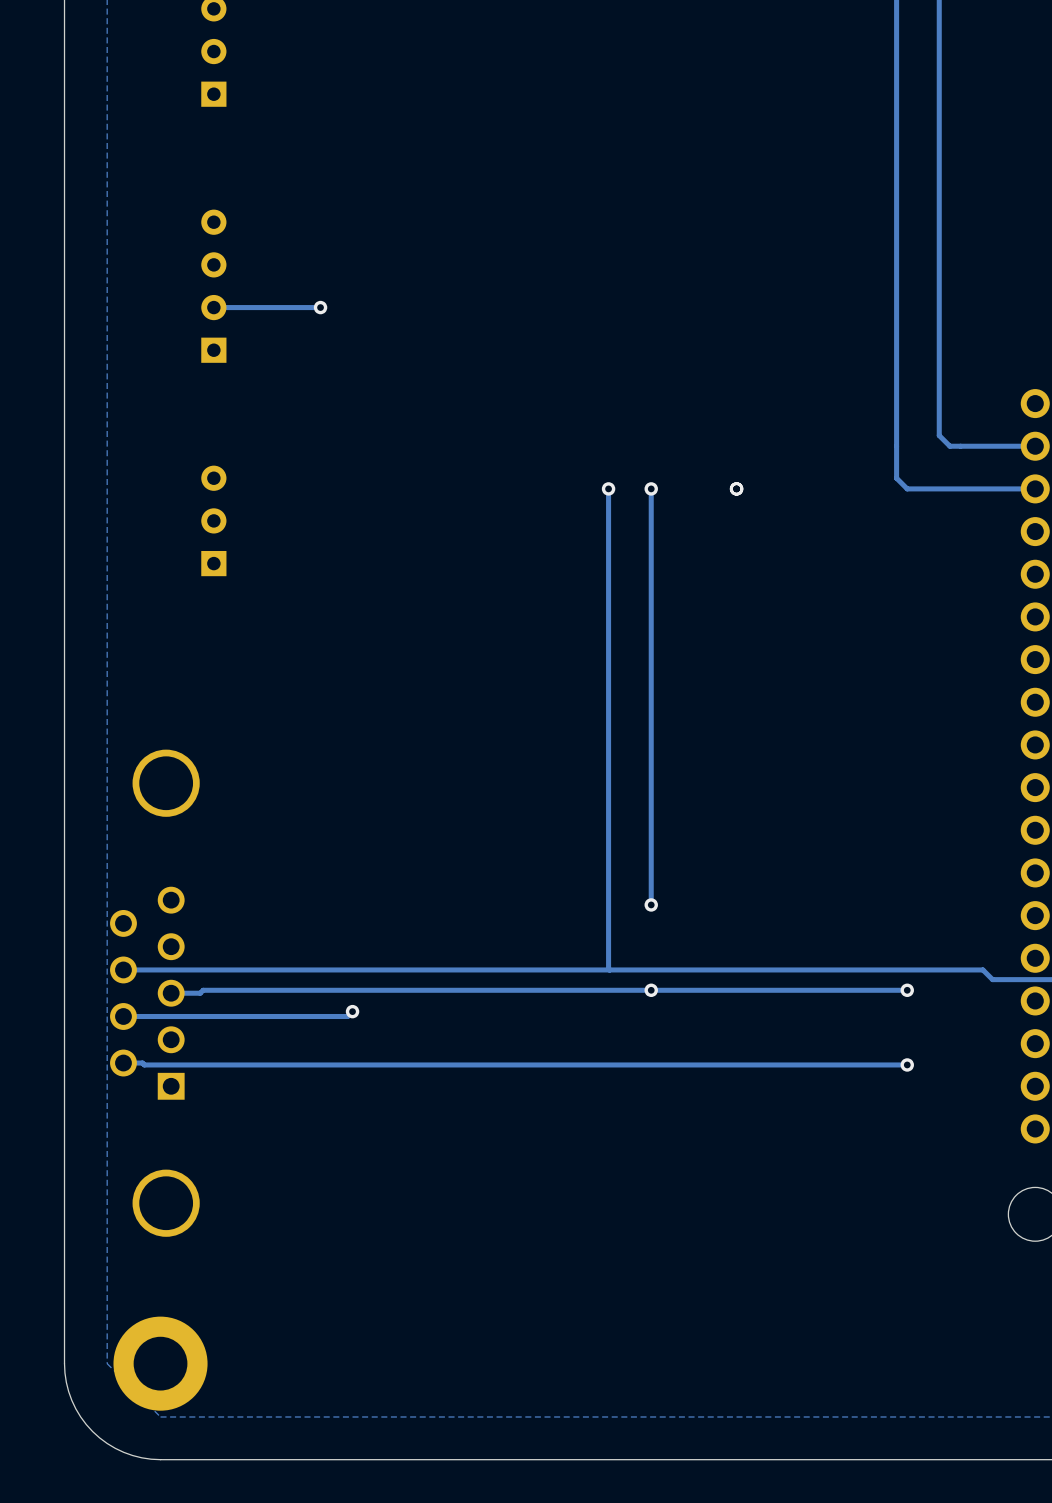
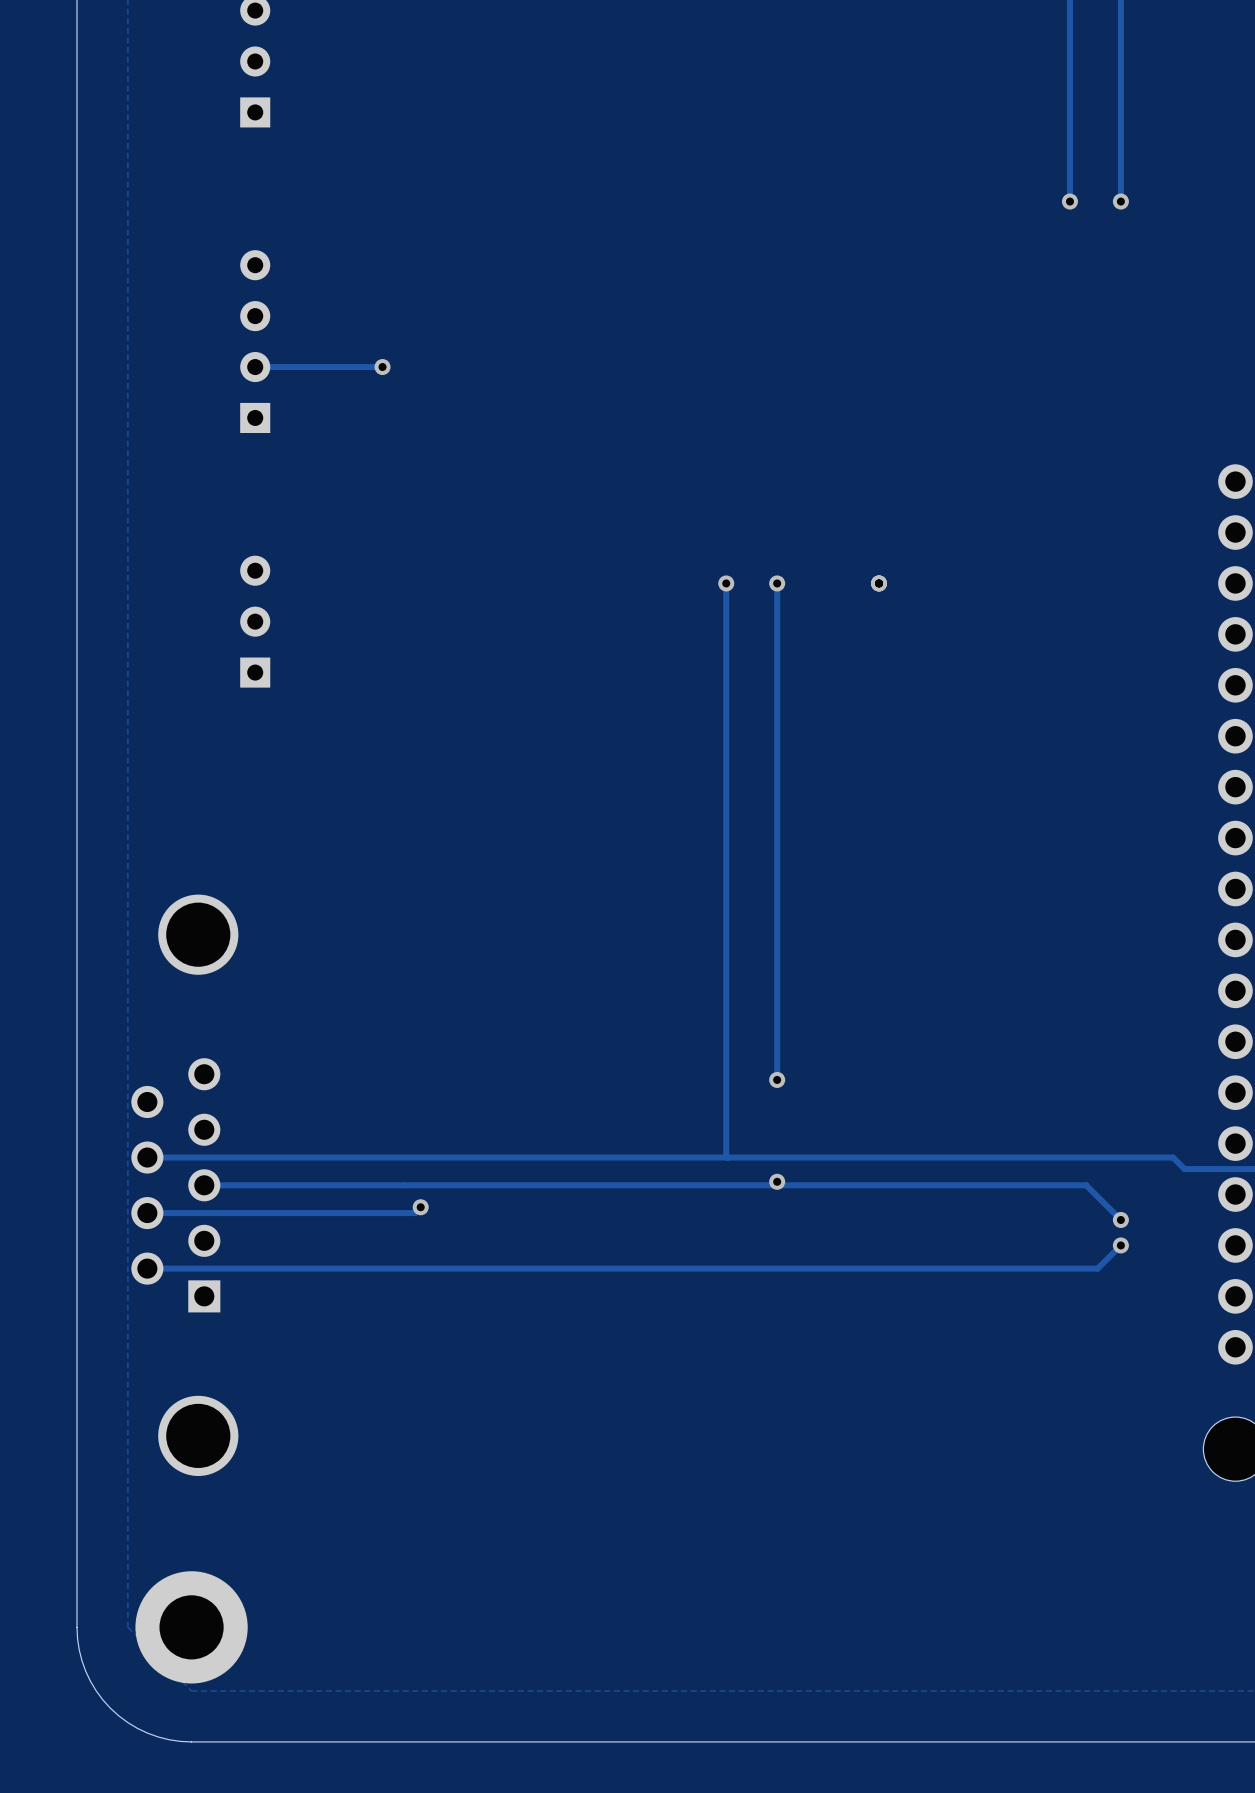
track: (896, 168) (896, 478) (907, 488) (1035, 488) -> none
via: none -> (1069, 201)
track: (939, 168) (939, 435) (949, 446) (1035, 446) -> none
via: none -> (1120, 201)
track: (907, 990) (203, 990) (200, 993) -> (1120, 1219) (1086, 1185) (238, 1185)
via: (907, 990) -> none
via: none -> (1120, 1219)
via: none -> (1120, 1245)
track: (142, 1063) (144, 1064) (907, 1064) -> (170, 1268) (1097, 1268) (1120, 1245)
via: (907, 1064) -> none

